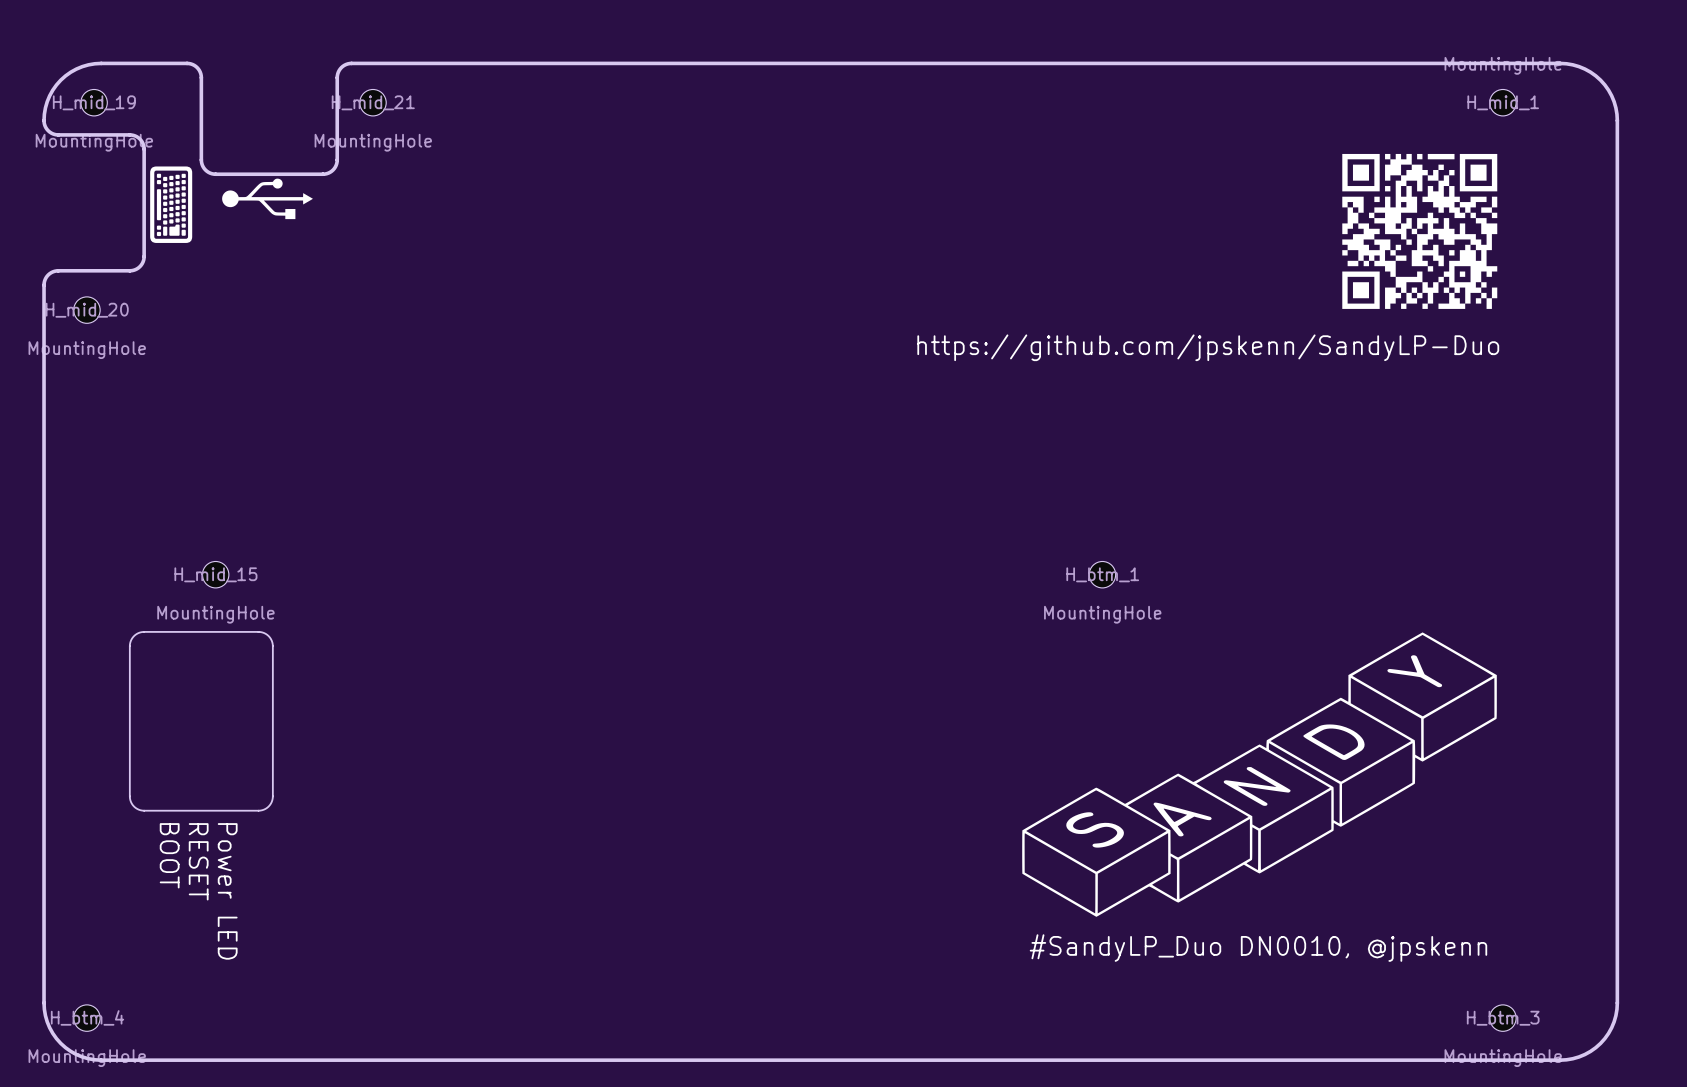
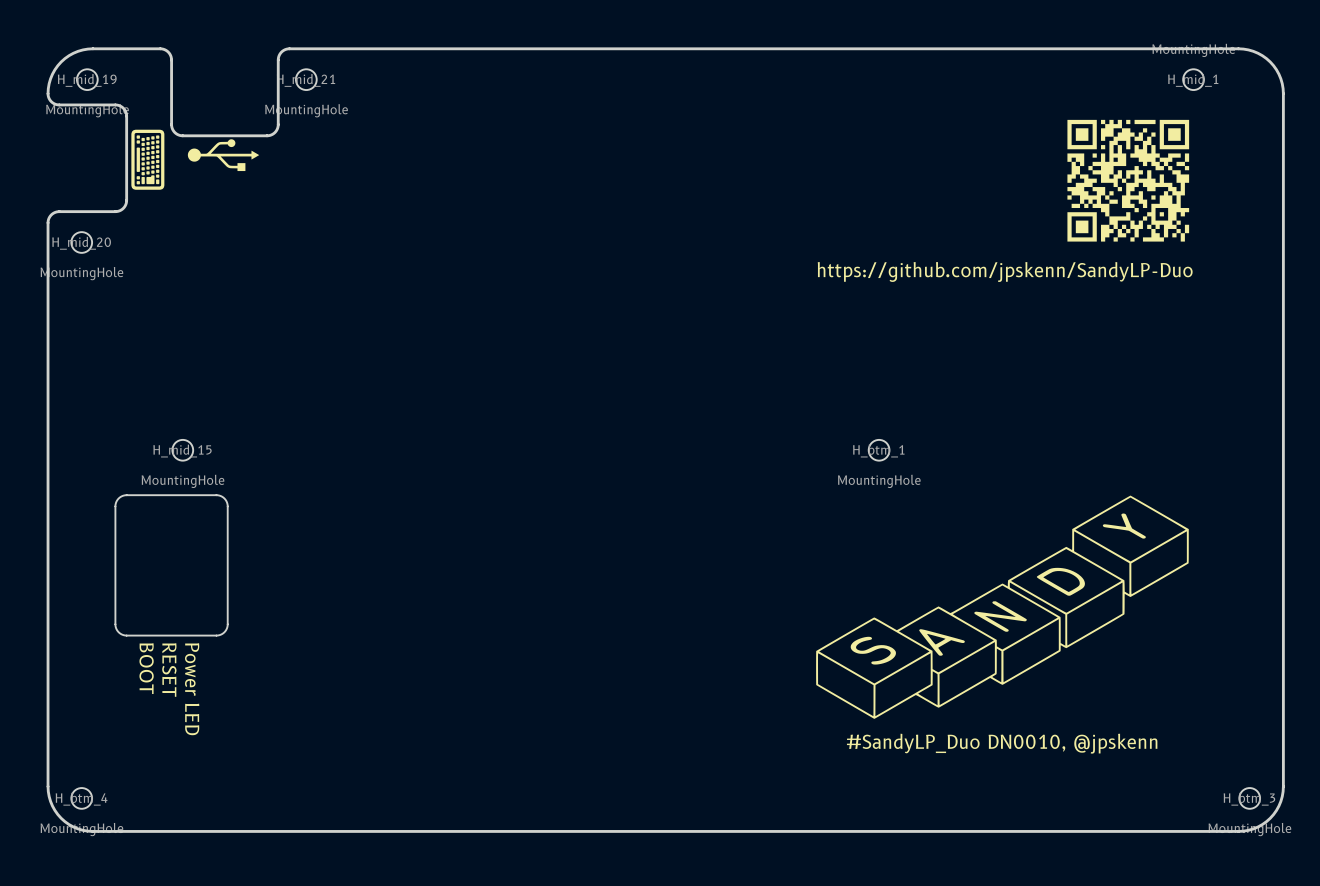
H_btm_3 position: (1502, 1018) -> (1249, 798)

